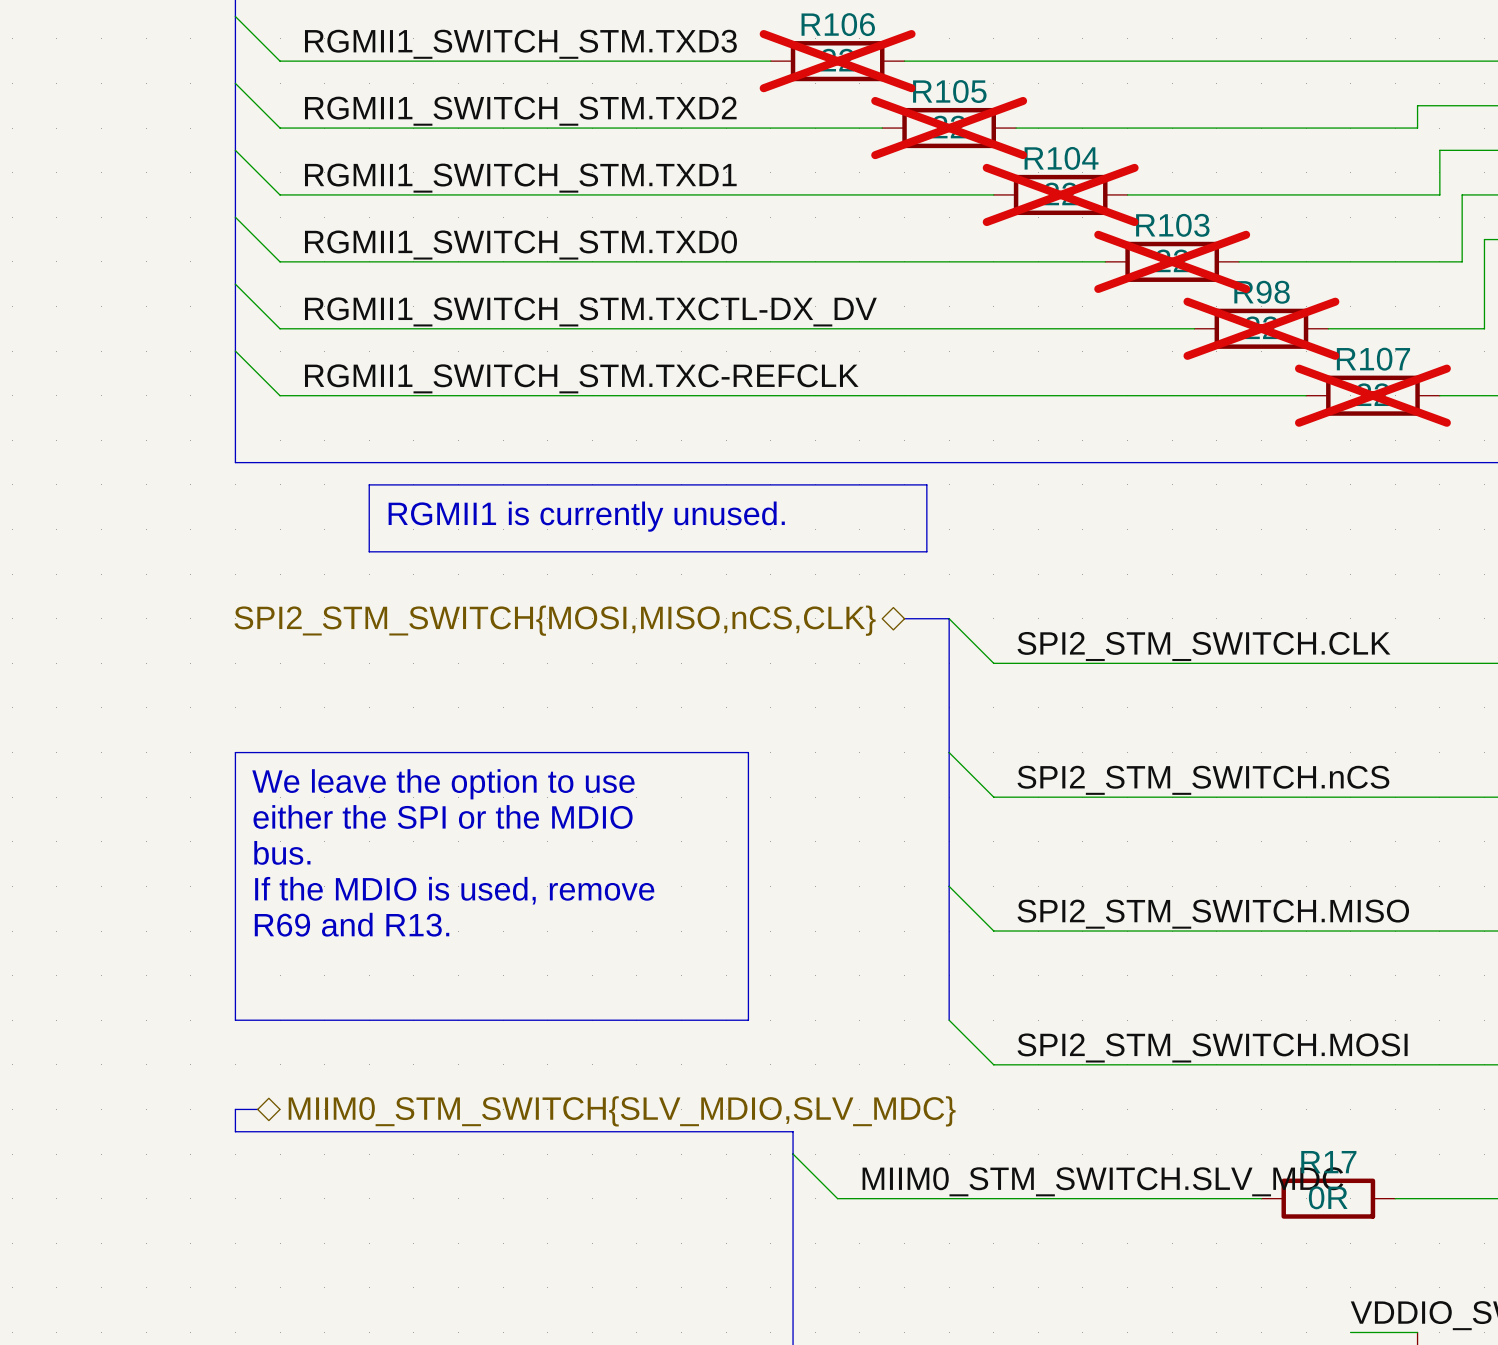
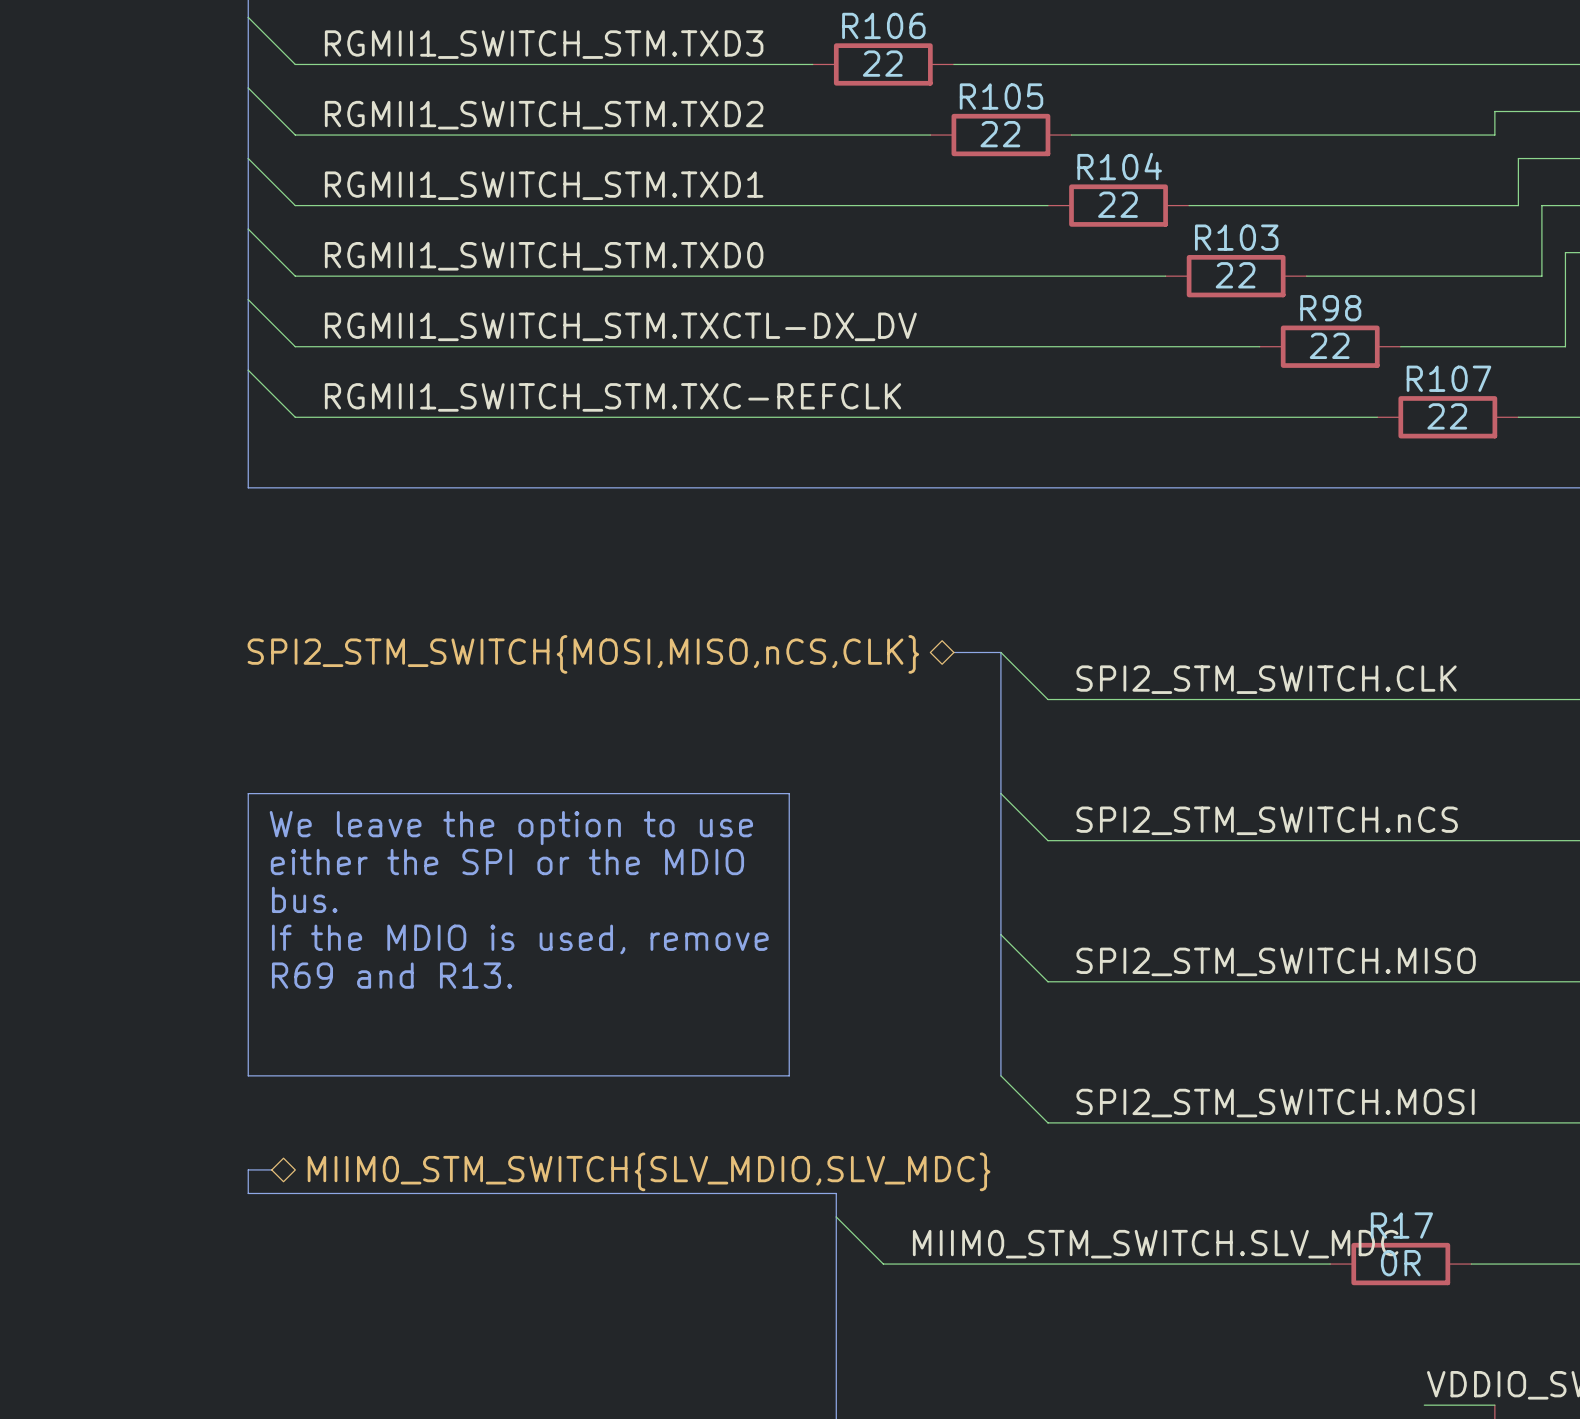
R106 do-not-place cross: (837, 61) -> none
R105 do-not-place cross: (949, 128) -> none
R104 do-not-place cross: (1060, 194) -> none
R103 do-not-place cross: (1172, 261) -> none
R98 do-not-place cross: (1261, 328) -> none
R107 do-not-place cross: (1372, 395) -> none
line: (369, 484) (926, 484) (926, 551) (369, 551) (369, 484) -> none
text: RGMII1 is currently unused. (586, 516) -> none

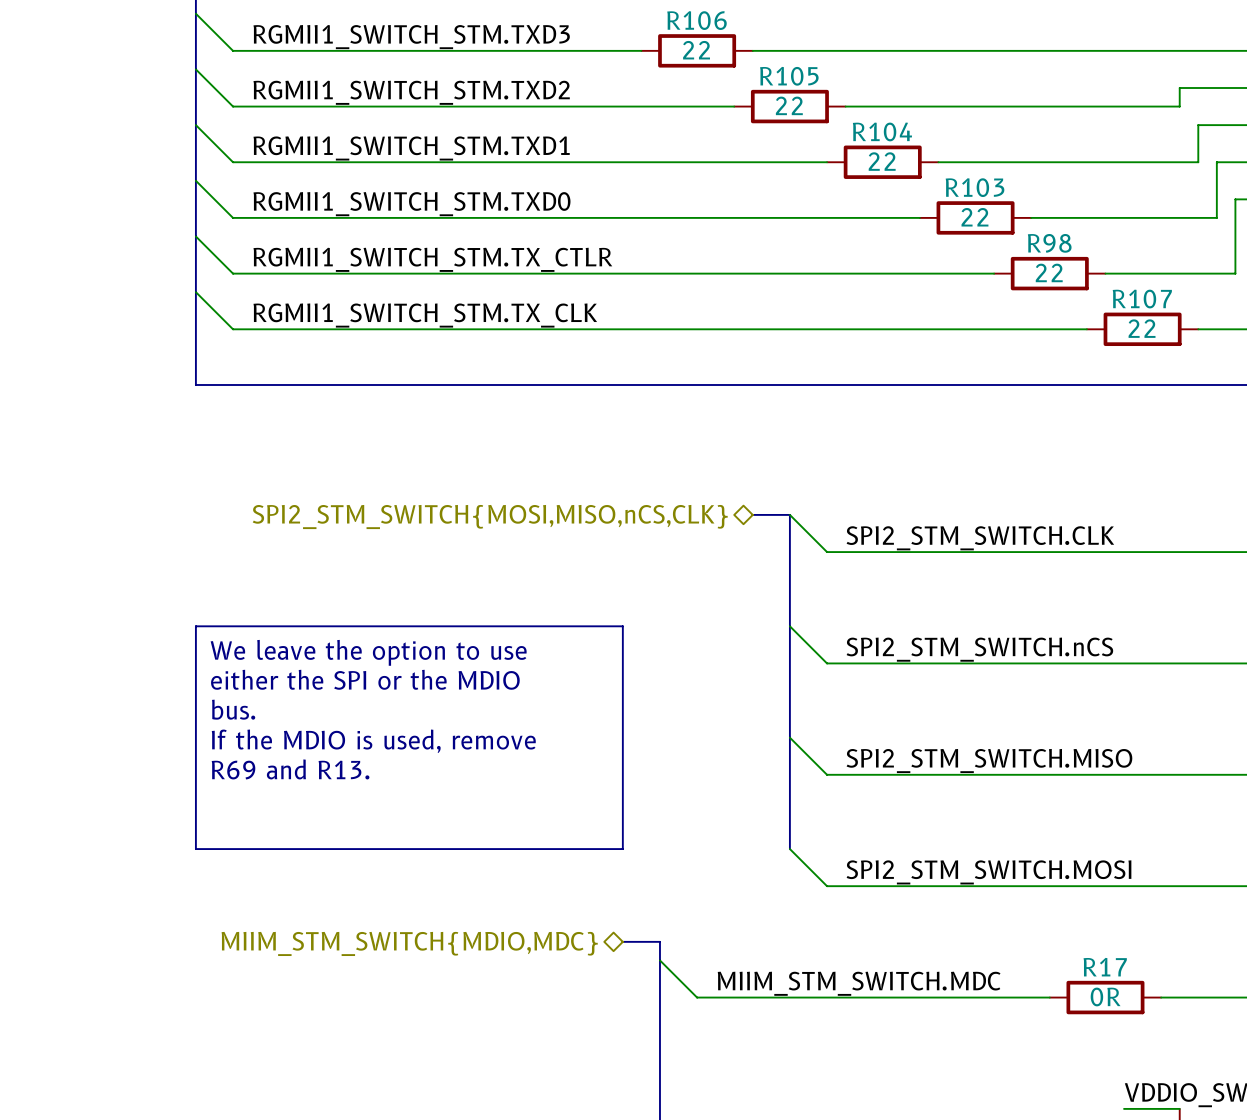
label: RGMII1_SWITCH_STM.TXCTL-DX_DV (620, 326) -> RGMII1_SWITCH_STM.TX_CTLR (432, 259)
label: RGMII1_SWITCH_STM.TXC-REFCLK (613, 397) -> RGMII1_SWITCH_STM.TX_CLK (425, 315)
bus: (271, 1169) (248, 1169) (248, 1193) (789, 1193) -> none
hierarchical label: MIIM0_STM_SWITCH{SLV_MDIO,SLV_MDC} (649, 1171) -> MIIM_STM_SWITCH{MDIO,MDC} (409, 943)
label: MIIM0_STM_SWITCH.SLV_MDC (1155, 1244) -> MIIM_STM_SWITCH.MDC (859, 983)

